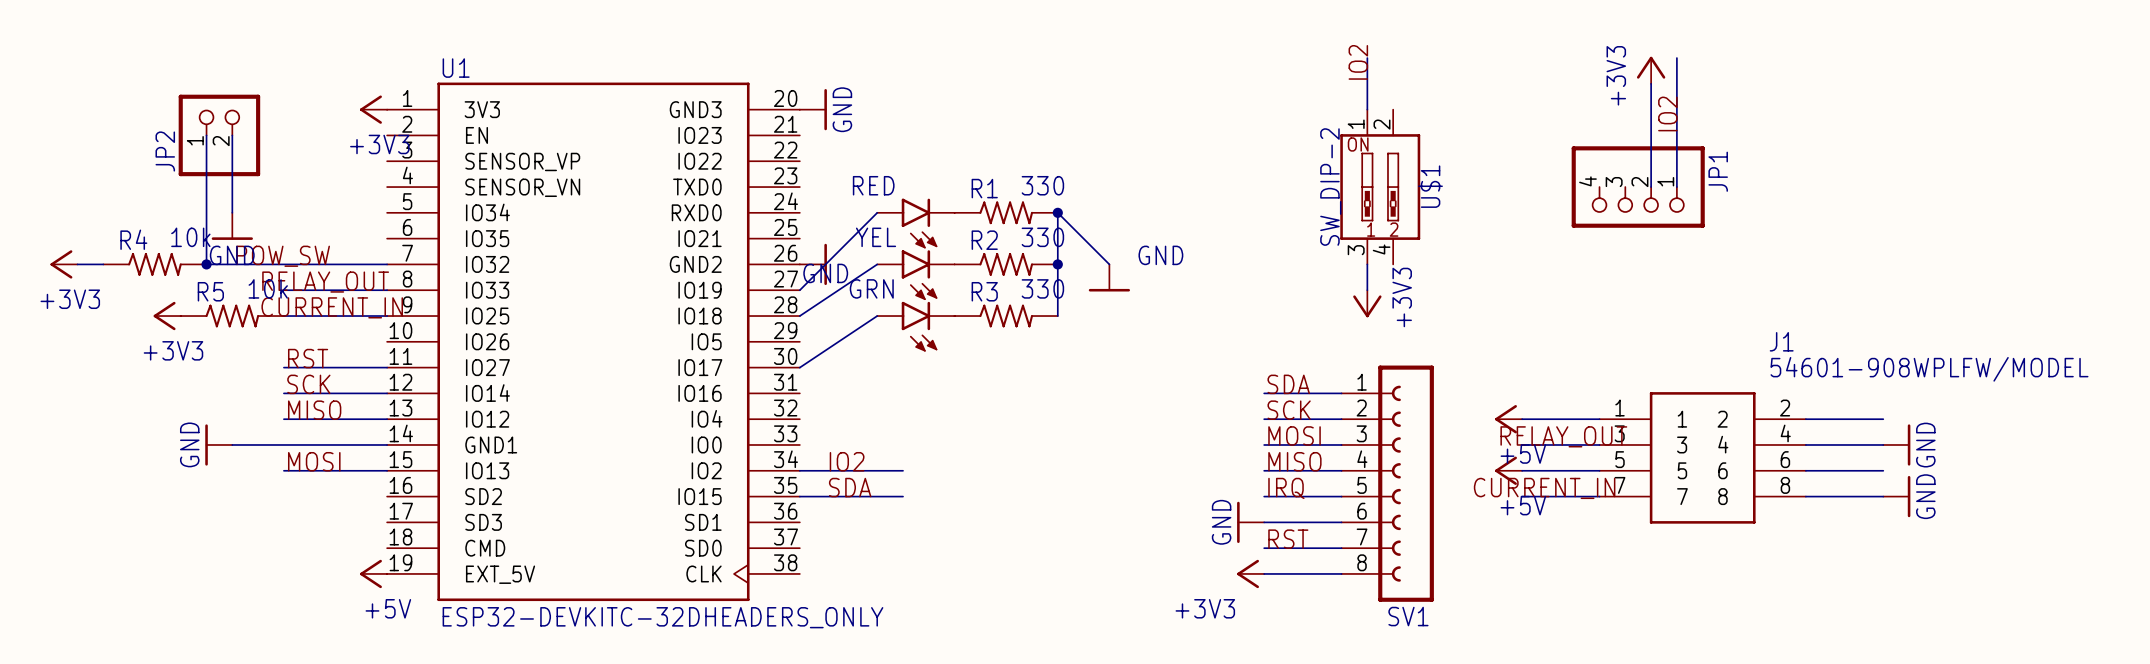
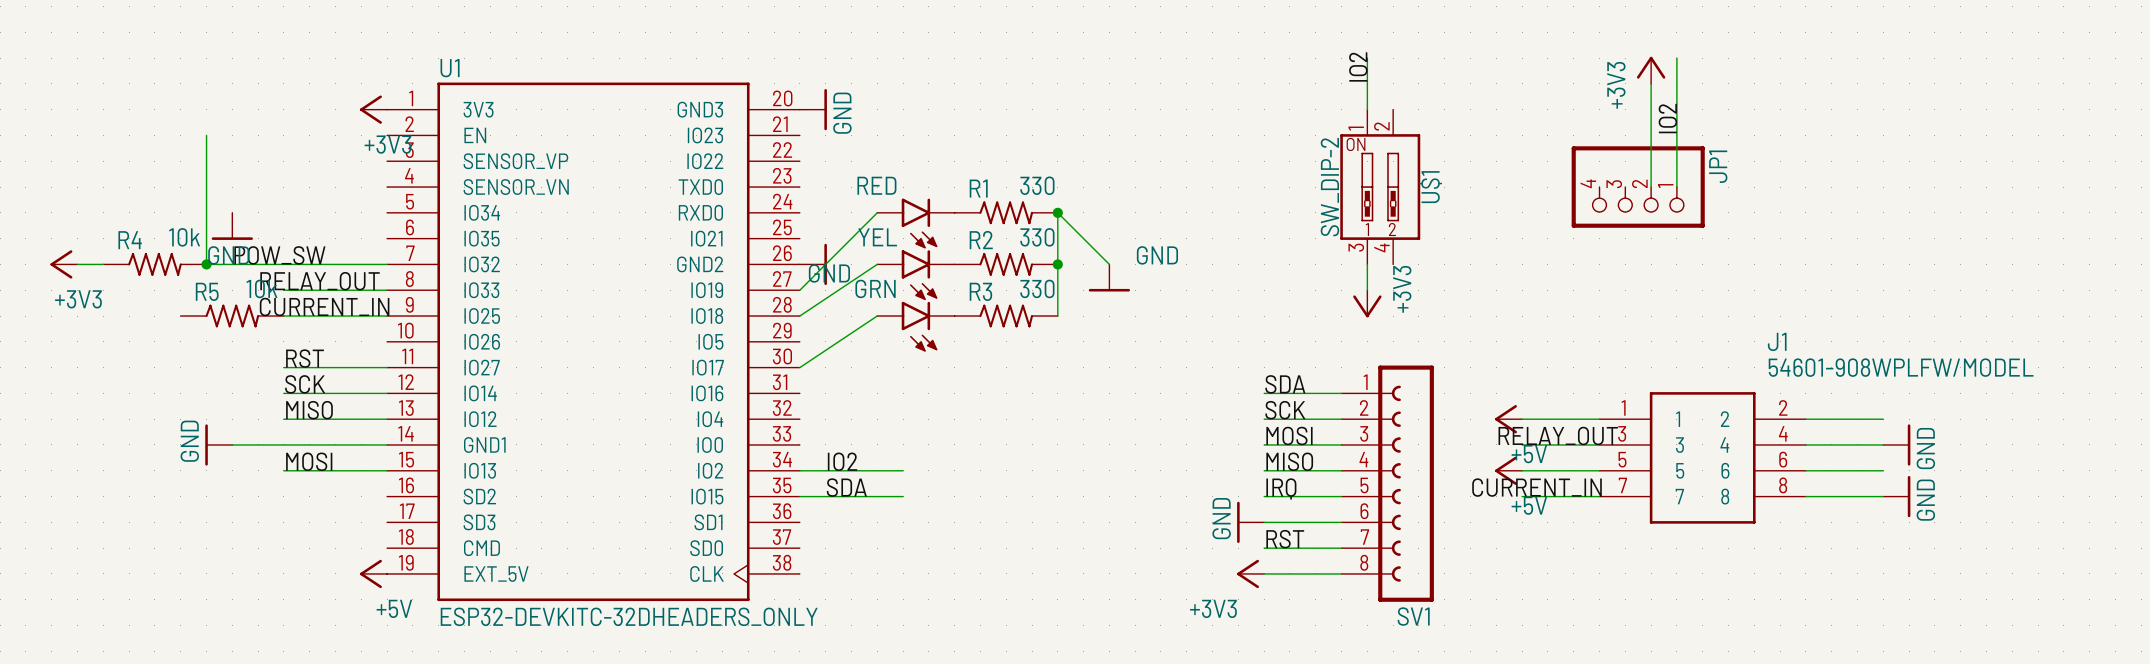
JP2: (219, 135) -> none
wire: (232, 135) (232, 212) -> none
power symbol: +3V3 (167, 316) -> none

